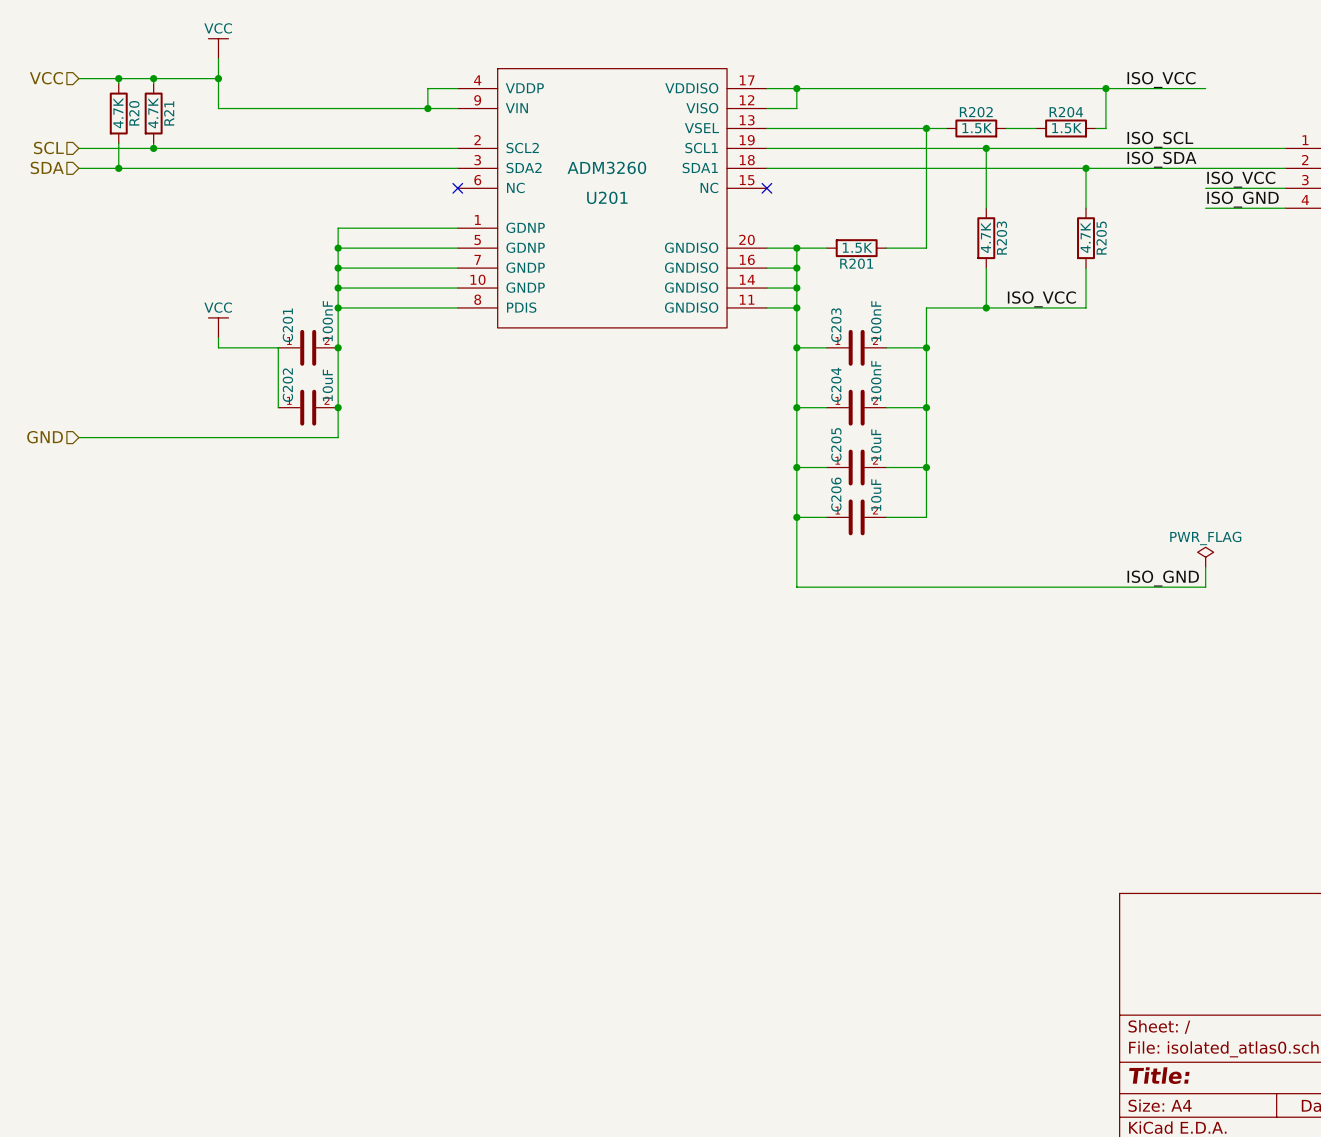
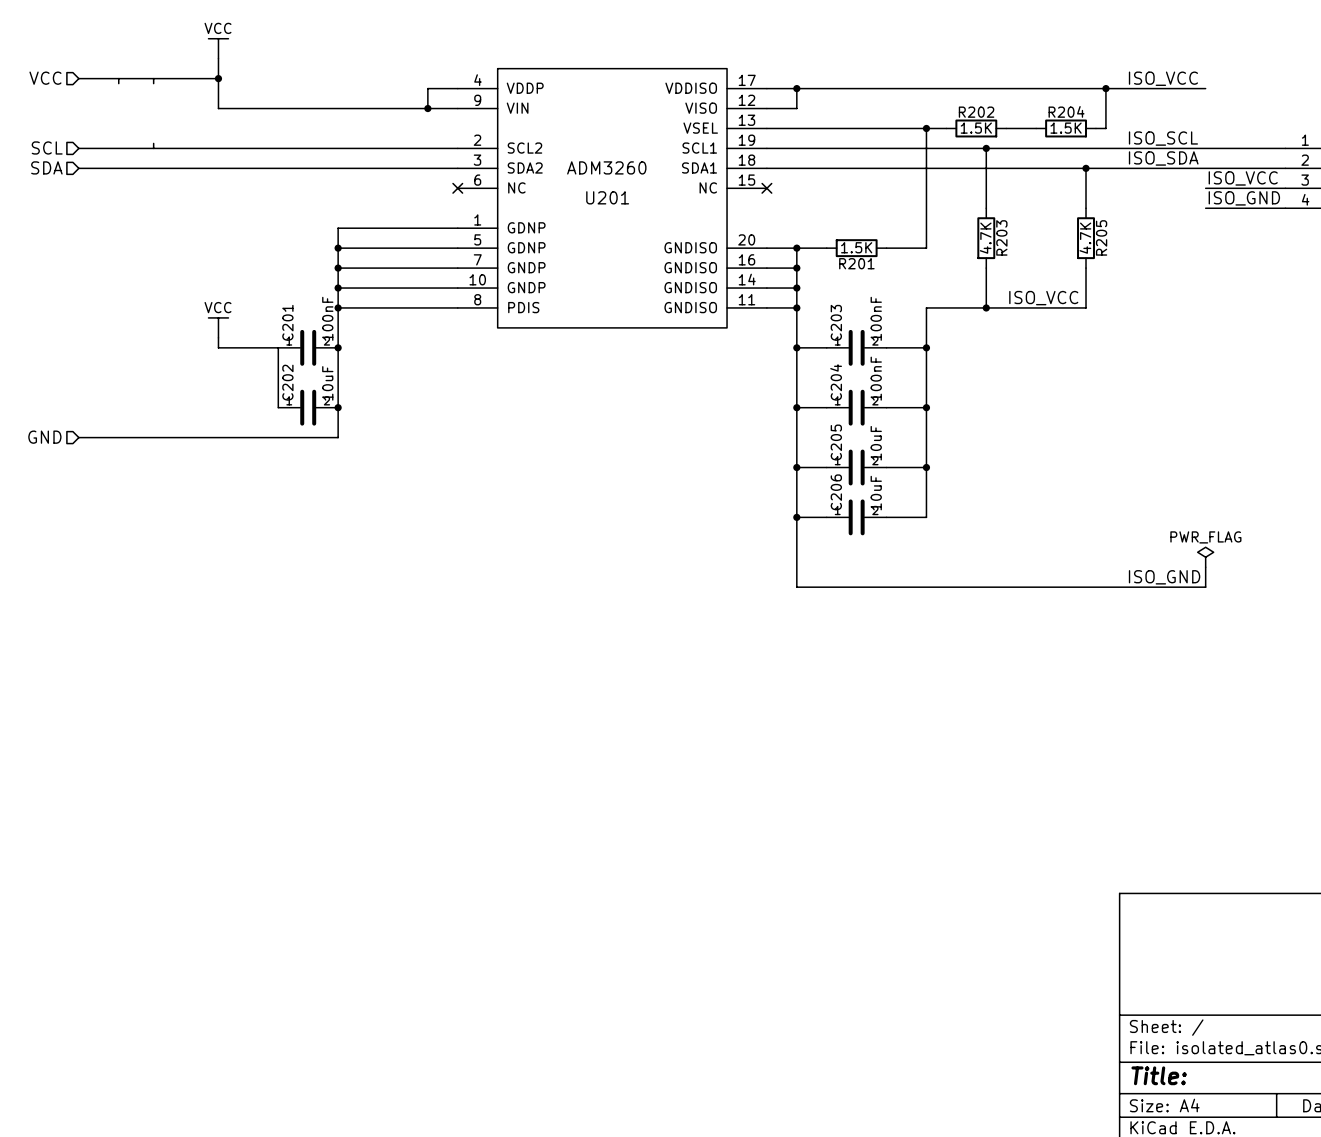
junction: (118, 78) -> none
junction: (153, 78) -> none
R20: 4.7K (118, 113) -> none
R21: 4.7K (153, 113) -> none
wire: (118, 143) (118, 168) -> none
junction: (153, 148) -> none
junction: (118, 168) -> none

